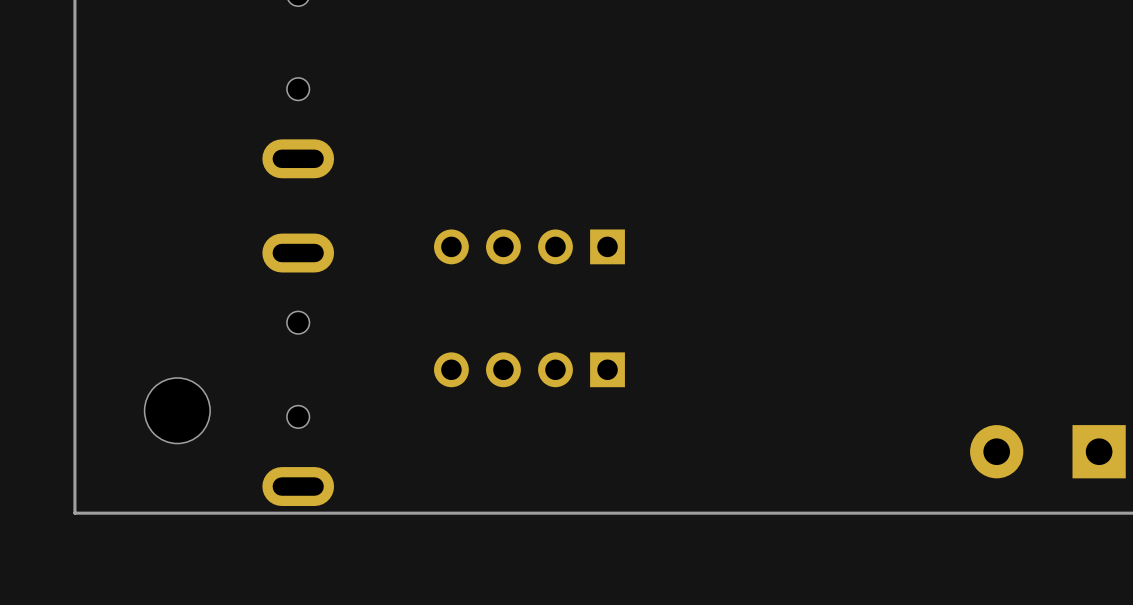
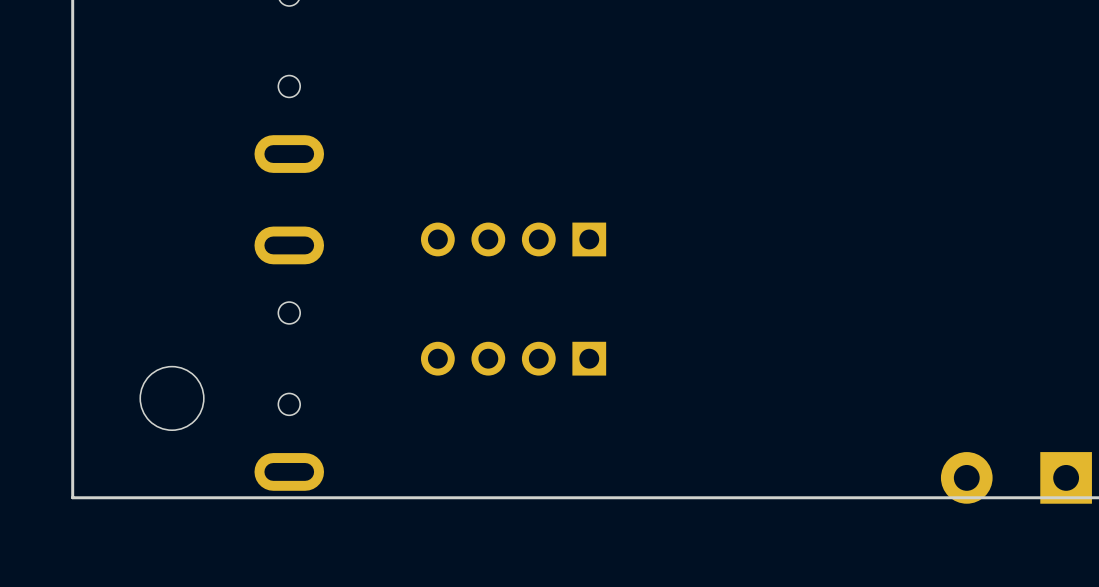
part position: (1047, 451) -> (1016, 477)

